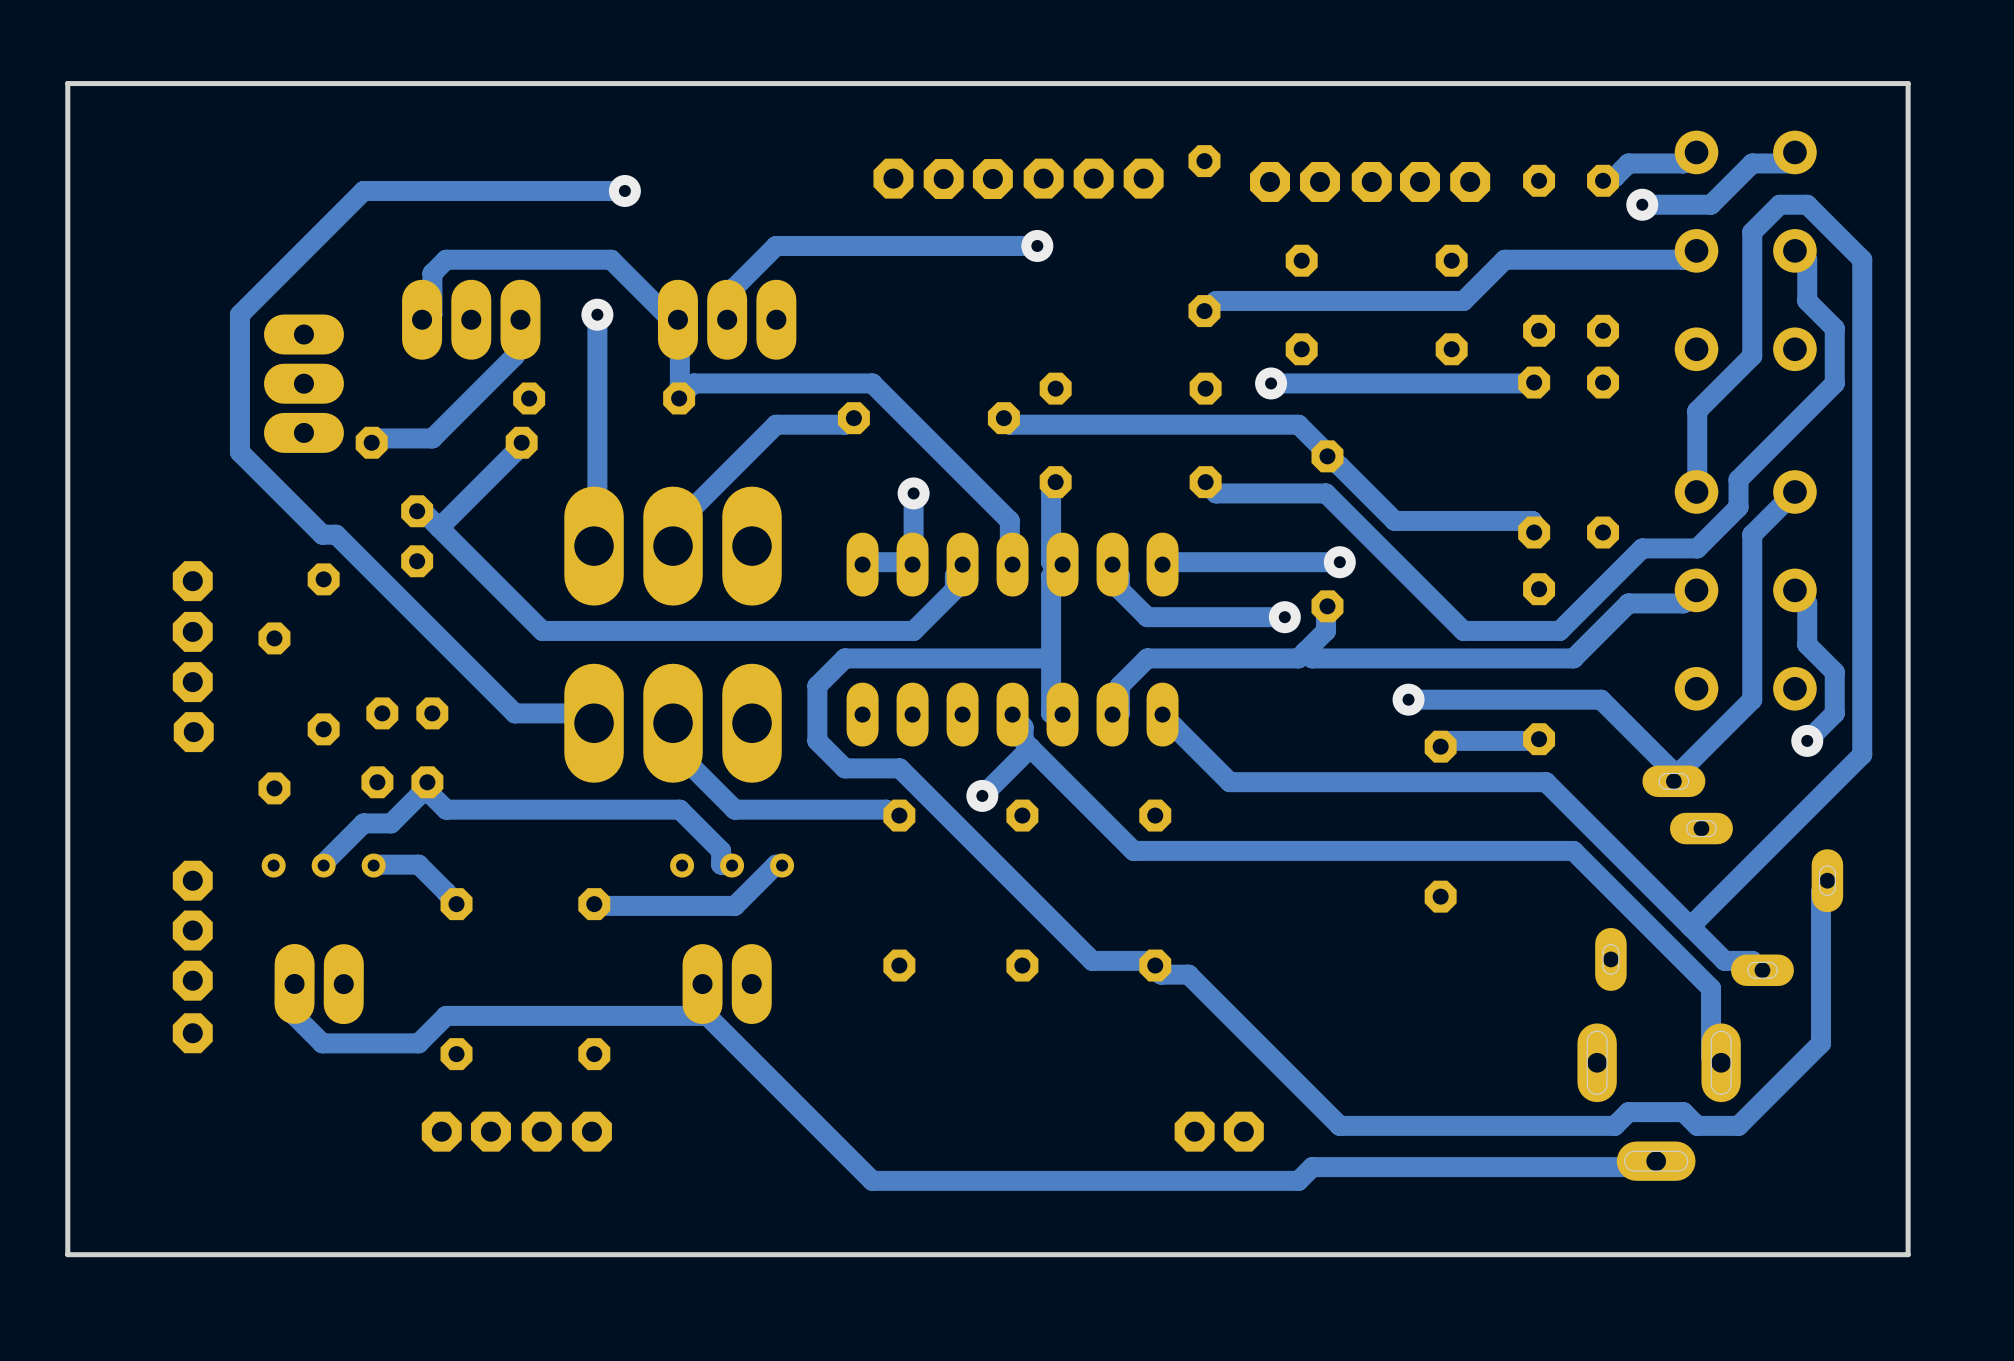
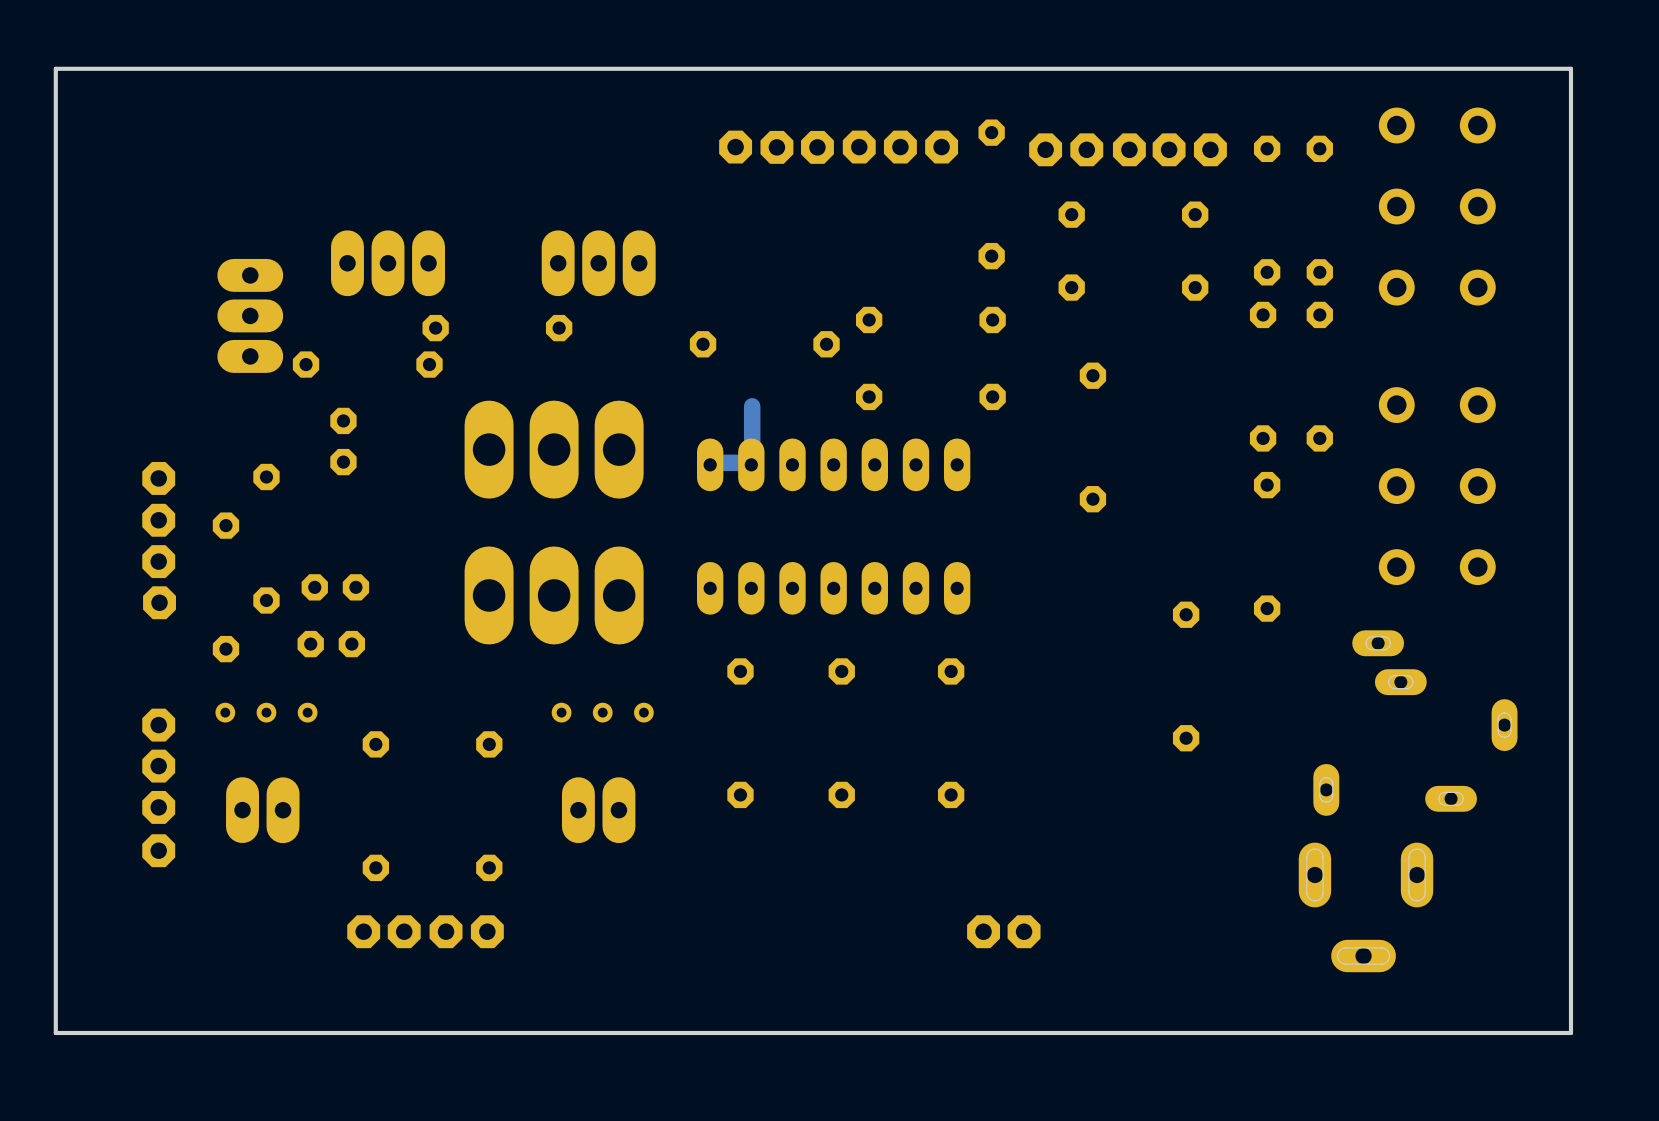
track: (1696, 152) (1683, 163) (1628, 163) (1614, 177) (1603, 180) -> none
track: (1794, 152) (1793, 163) (1752, 163) (1711, 204) (1642, 204) -> none
track: (624, 190) (363, 190) (239, 314) (239, 452) (322, 534) (336, 534) (514, 713) (583, 713) (594, 723) -> none
via: (624, 190) -> none
via: (1642, 204) -> none
track: (1037, 245) (776, 245) (734, 287) (734, 314) (727, 319) -> none
via: (1037, 245) -> none
track: (1696, 250) (1683, 259) (1504, 259) (1463, 300) (1216, 300) (1204, 311) -> none
track: (1794, 250) (1807, 259) (1807, 300) (1834, 328) (1834, 383) (1738, 479) (1738, 507) (1697, 548) (1642, 548) (1559, 630) (1463, 630) (1326, 493) (1216, 493) (1205, 482) -> none
track: (597, 314) (597, 534) (594, 546) -> none
via: (597, 314) -> none
track: (422, 319) (432, 314) (432, 273) (446, 259) (611, 259) (666, 314) (677, 319) (679, 328) (679, 398) (693, 383) (872, 383) (1009, 520) (1009, 562) (1012, 564) -> none
track: (520, 319) (514, 328) (514, 355) (432, 438) (377, 438) (371, 442) -> none
track: (1534, 382) (1271, 383) -> none
via: (1271, 383) -> none
track: (853, 418) (844, 424) (776, 424) (666, 534) (673, 546) -> none
track: (1003, 418) (1009, 424) (1298, 424) (1326, 452) (1327, 456) (1339, 465) (1394, 520) (1532, 520) (1534, 532) -> none
track: (521, 442) (514, 452) (439, 527) -> none
track: (1055, 482) (1051, 493) (1051, 562) (1062, 564) (1051, 575) (1051, 713) (1062, 714) -> none
track: (1696, 491) (1697, 410) (1752, 355) (1752, 232) (1779, 204) (1807, 204) (1862, 259) (1862, 754) (1690, 926) -> none
track: (1794, 491) (1752, 534) (1752, 699) (1683, 768) (1673, 781) (1669, 768) (1601, 699) (1408, 699) -> none
via: (913, 493) -> none
track: (417, 511) (418, 507) (542, 630) (913, 630) (954, 589) (954, 575) (962, 564) -> none
track: (1339, 562) (1174, 562) (1162, 564) -> none
via: (1339, 562) -> none
track: (1112, 564) (1119, 575) (1119, 589) (1147, 617) (1284, 617) -> none
track: (1696, 590) (1683, 603) (1628, 603) (1573, 658) (1312, 658) (1305, 651) -> none
track: (1794, 590) (1807, 603) (1807, 644) (1834, 672) (1834, 713) (1807, 740) -> none
track: (1327, 606) (1326, 630) (1298, 658) (1147, 658) (1119, 685) (1119, 713) (1112, 714) -> none
via: (1284, 617) -> none
track: (1051, 658) (844, 658) (817, 685) (817, 740) (844, 768) (899, 768) (1092, 960) (1147, 960) (1155, 965) (1161, 974) (1188, 974) (1339, 1125) (1614, 1125) (1628, 1112) (1683, 1112) (1697, 1125) (1738, 1125) (1821, 1043) (1821, 892) (1827, 880) -> none
via: (1408, 699) -> none
track: (1012, 714) (1023, 727) (1023, 740) (1133, 850) (1573, 850) (1711, 988) (1711, 1057) (1721, 1062) -> none
track: (1162, 714) (1229, 782) (1546, 782) (1724, 960) (1752, 960) (1762, 970) -> none
track: (673, 723) (679, 727) (679, 754) (734, 809) (886, 809) (899, 815) -> none
track: (1539, 739) (1532, 740) (1449, 740) (1440, 746) -> none
via: (1807, 740) -> none
track: (1030, 747) (982, 795) -> none
via: (982, 795) -> none
track: (373, 865) (418, 864) (456, 904) -> none
track: (732, 865) (721, 864) (721, 850) (679, 809) (446, 809) (432, 795) (427, 782) (418, 795) (391, 823) (363, 823) (322, 864) (323, 865) -> none
track: (782, 865) (776, 864) (734, 905) (597, 905) (594, 904) -> none
track: (294, 983) (294, 1015) (322, 1043) (418, 1043) (446, 1015) (707, 1015) -> none
track: (707, 1015) (872, 1180) (1298, 1180) (1312, 1167) (1656, 1167) (1656, 1161) -> none

